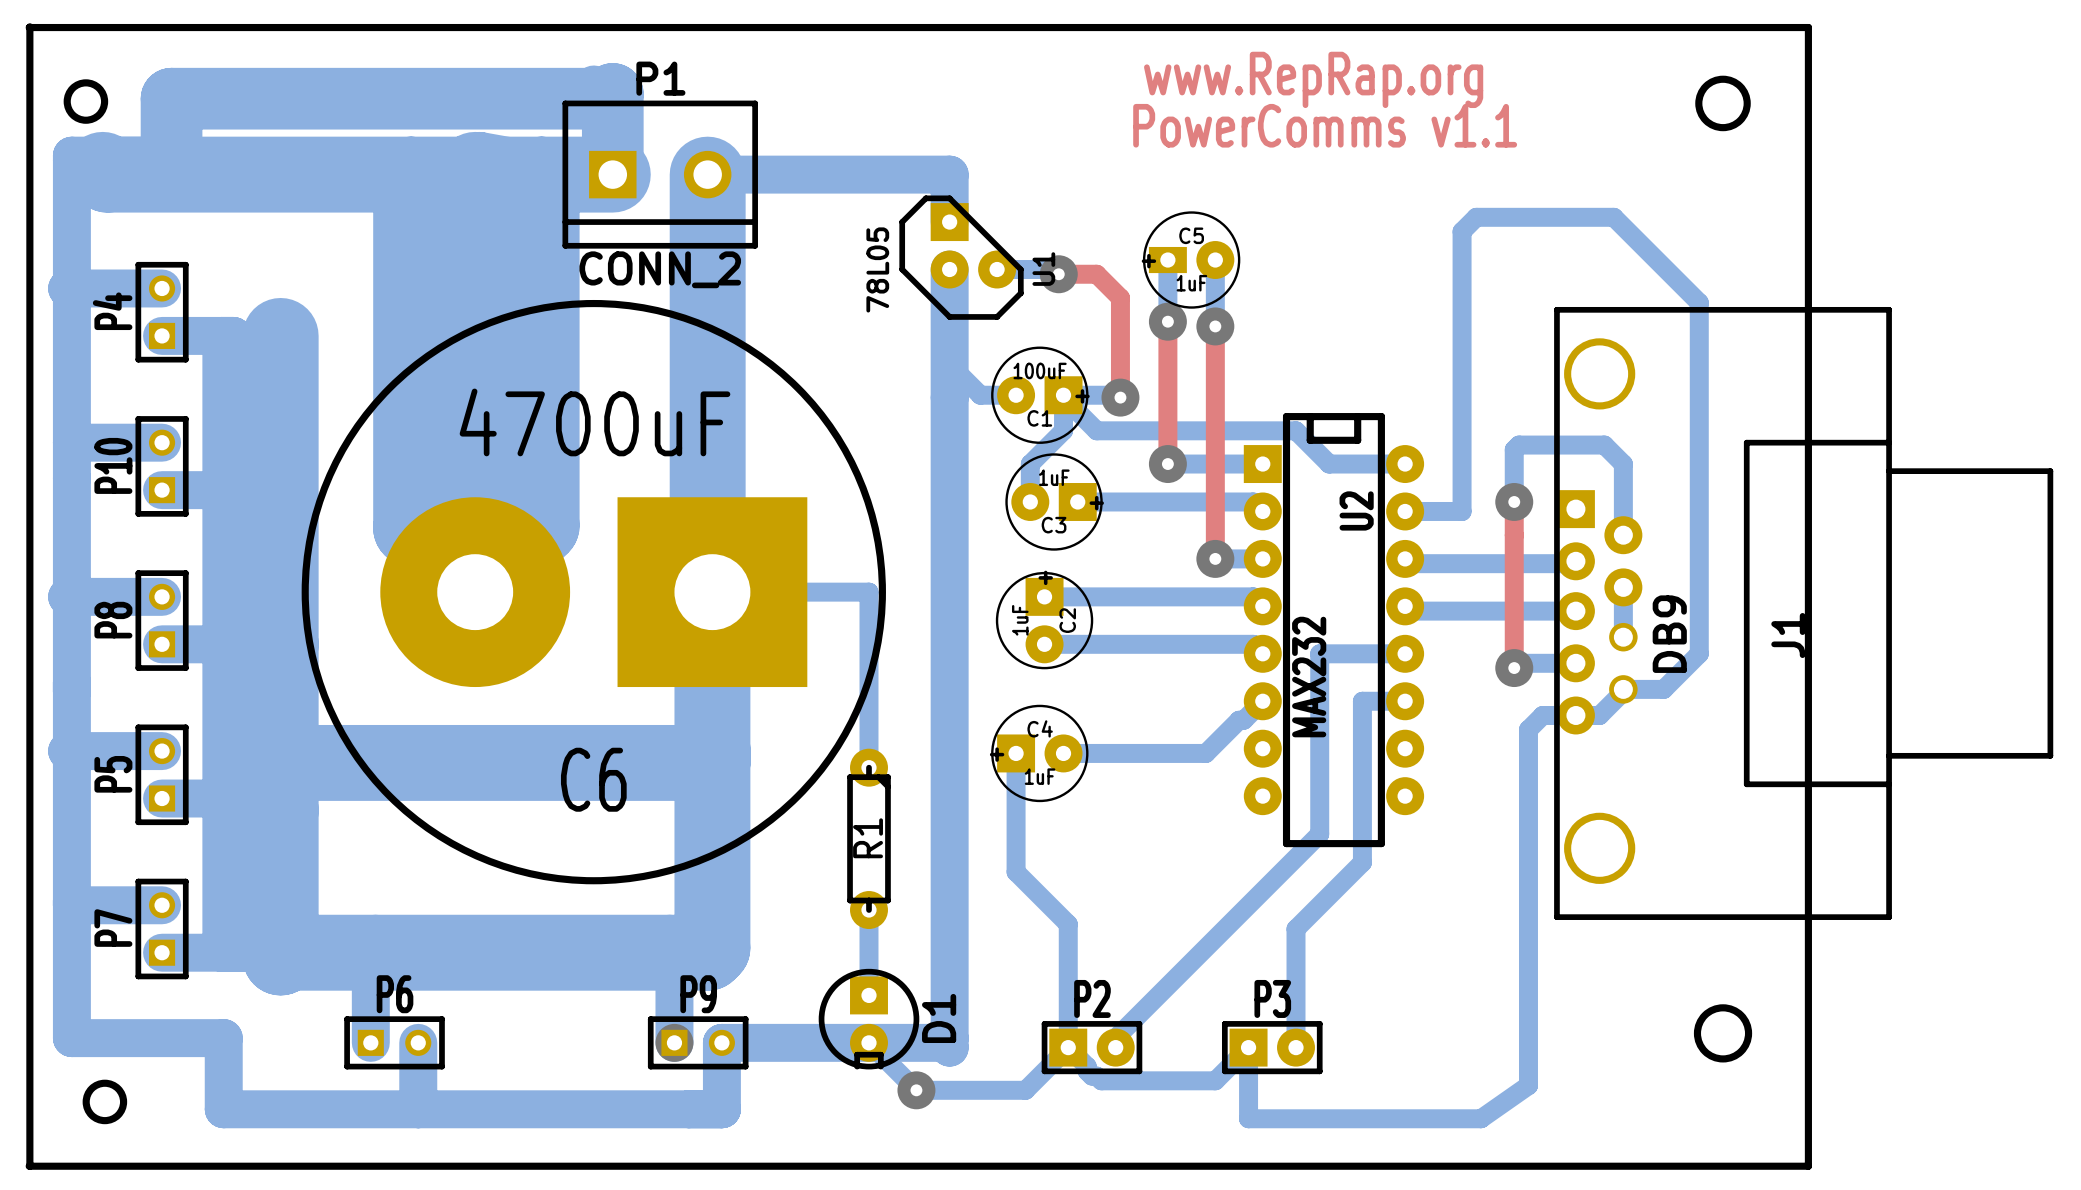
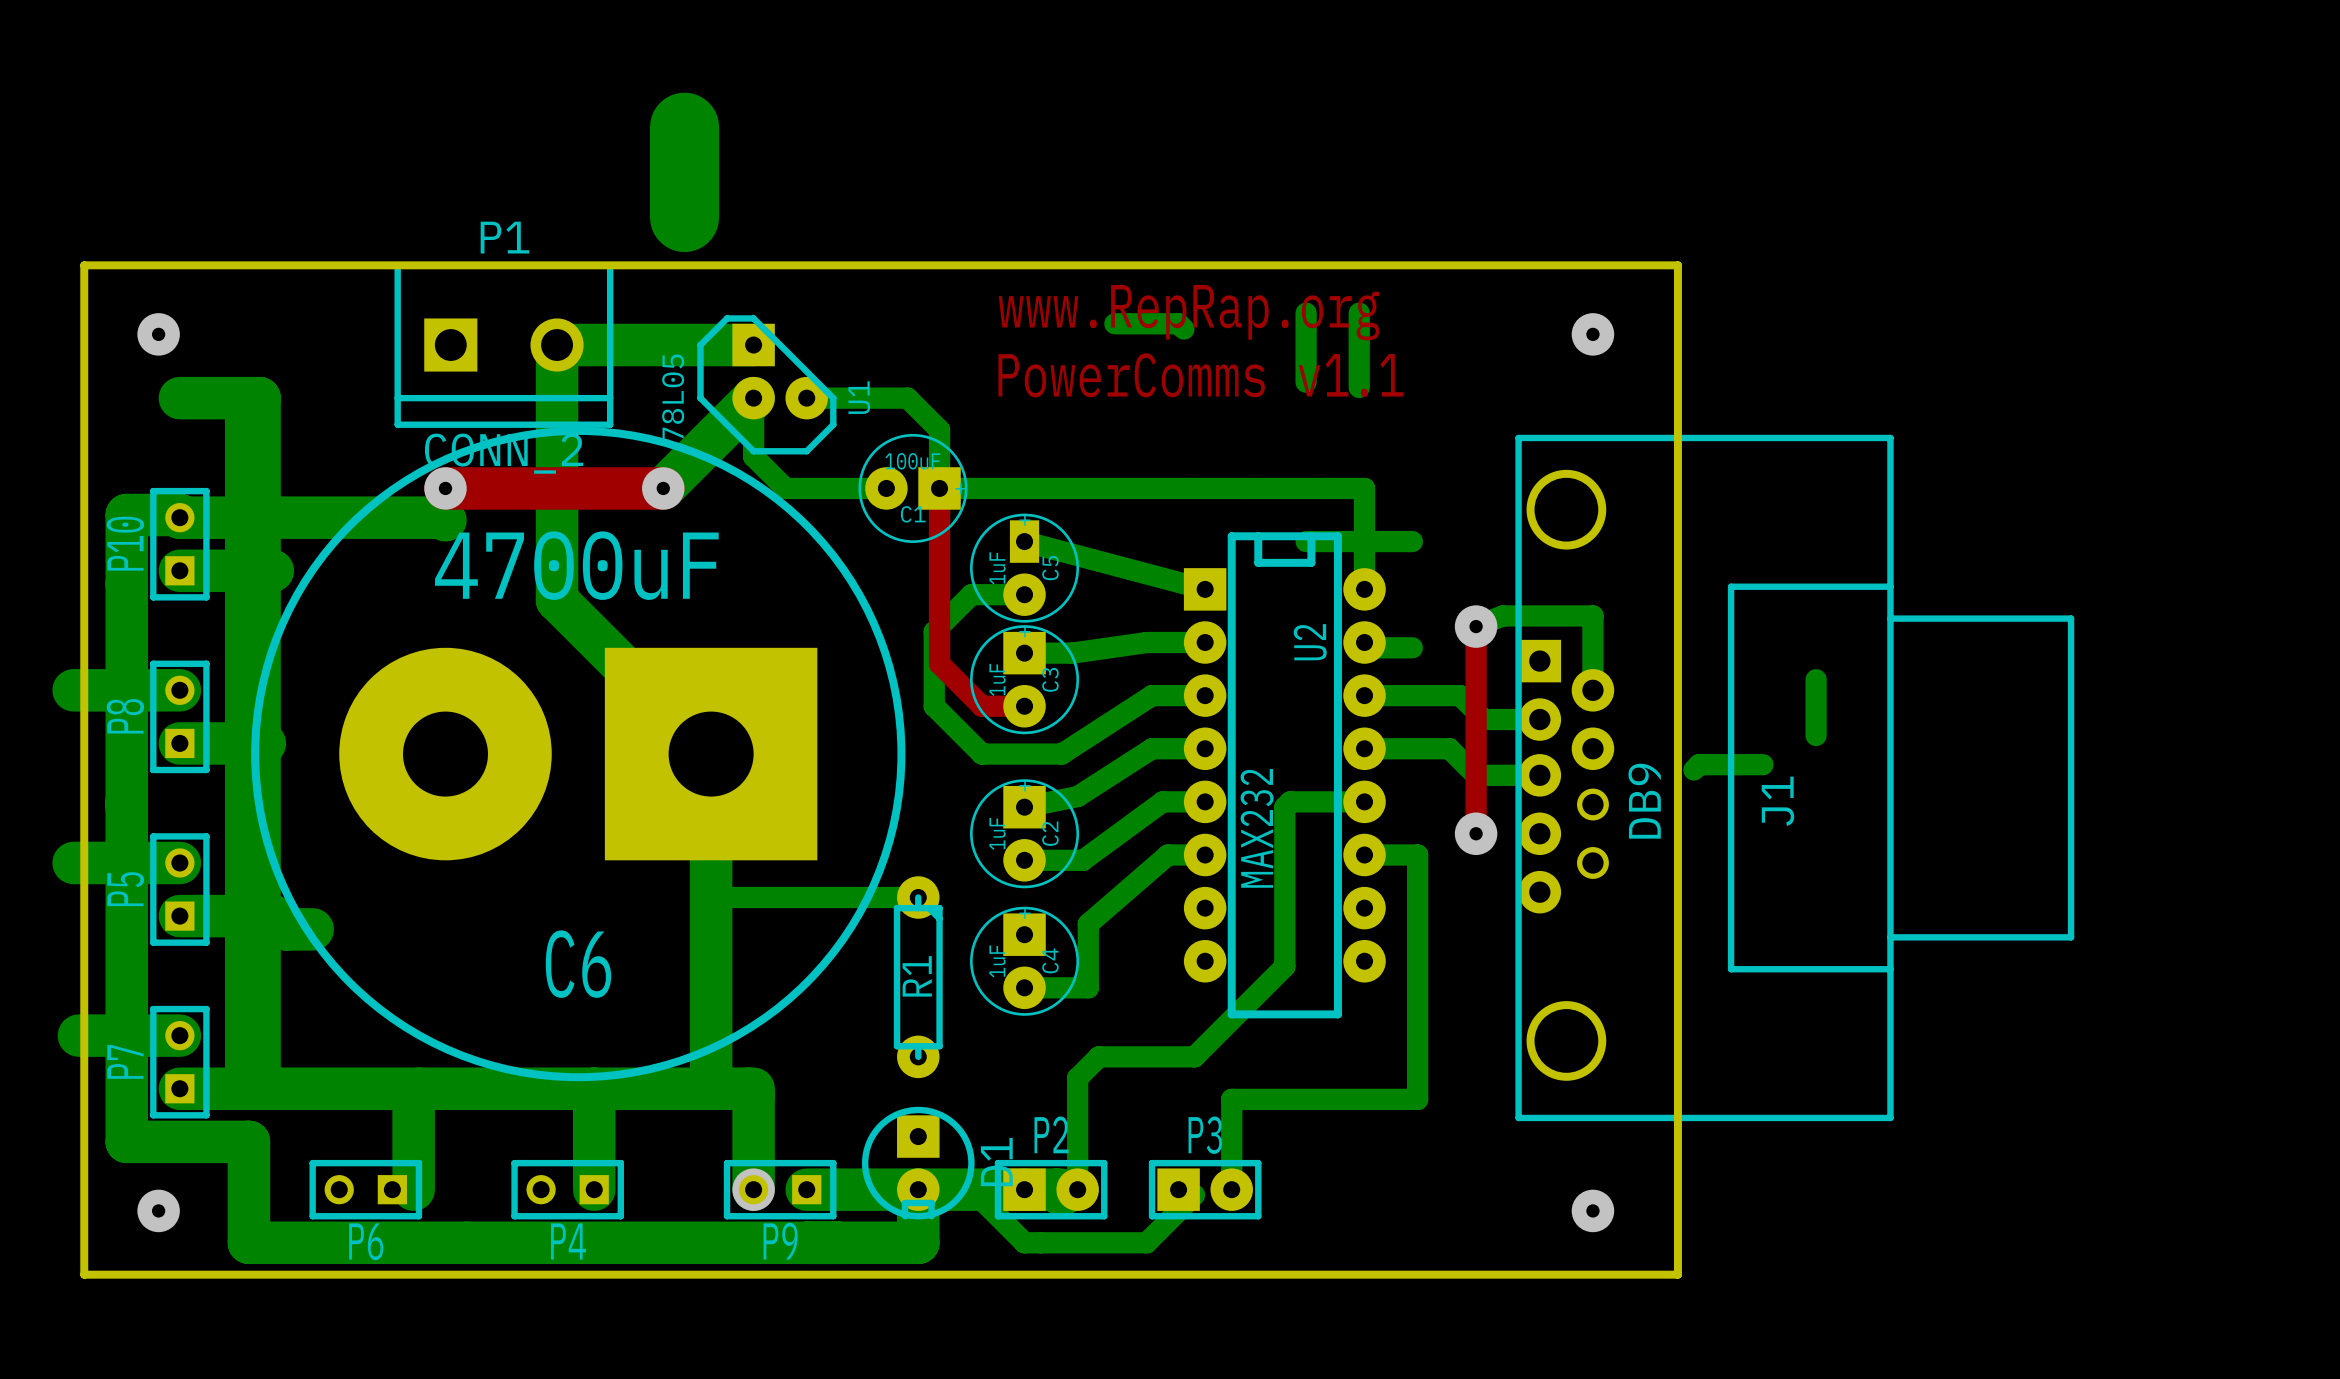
board edge: (29, 26) (29, 1166) -> none
board edge: (29, 27) (1808, 27) (1808, 1166) (29, 1166) -> none
round board edge: [1695, 75, 1751, 132] -> none
round board edge: [63, 79, 109, 124] -> none
text position: www.RepRap.org (1313, 79) -> www.RepRap.org (1189, 312)
bottom track: (593, 84) (612, 93) (608, 98) (171, 98) (171, 155) -> none
text position: PowerComms v1.1 (1325, 125) -> PowerComms v1.1 (1200, 375)
bottom track: (171, 155) (71, 155) (71, 1038) (223, 1038) -> (445, 520) (442, 517) (179, 517) (179, 515) (126, 515) (126, 1141) (248, 1141) (248, 1184)
bottom track: (102, 169) (107, 174) (612, 174) (479, 150) (475, 155) (475, 169) (475, 592) -> none
bottom track: (411, 174) (411, 528) (475, 592) -> none
bottom track: (541, 174) (541, 525) (475, 592) -> none
P1 position: (660, 174) -> (503, 345)
board edge: none -> (84, 265) (1677, 265) (1677, 1274) (84, 1274) (84, 265)
bottom track: (949, 222) (949, 174) (707, 174) (707, 587) (712, 592) -> none
U1 position: (961, 257) -> (766, 384)
C5 rotation: 0° (1191, 260) -> 90° clockwise (1024, 568)
C5 position: (1191, 260) -> (1024, 568)
top track: (1058, 274) (1096, 274) (1120, 297) (1120, 397) -> none
via: (1058, 274) -> none
via: none -> (158, 334)
via: none -> (1592, 334)
bottom track: (67, 288) (162, 288) -> none
bottom track: none -> (753, 345) (557, 345) (557, 600) (711, 754)
P4 rotation: 0° (162, 312) -> 90° counterclockwise (567, 1189)
P4 position: (162, 312) -> (567, 1189)
top track: (1167, 321) (1167, 464) -> none
via: (1167, 321) -> none
top track: (1215, 326) (1215, 558) -> none
via: (1215, 326) -> none
bottom track: (280, 335) (280, 957) -> none
bottom track: none -> (806, 398) (907, 398) (939, 430) (939, 488) (1364, 488) (1364, 589)
bottom track: (1016, 395) (980, 395) (949, 364) (949, 269) (949, 1038) (944, 1042) -> none
C1 position: (1039, 395) -> (912, 488)
bottom track: (1063, 397) (1096, 430) (1296, 430) (1329, 464) (1405, 464) -> none
bottom track: (1120, 397) (1118, 395) (1063, 395) (1063, 430) (1030, 464) (1030, 501) -> none
via: (1120, 397) -> none
top track: none -> (445, 488) (663, 488)
via: none -> (445, 488)
bottom track: none -> (663, 488) (753, 398) (753, 456) (785, 488) (886, 488)
via: none -> (663, 488)
top track: none -> (939, 488) (939, 663) (982, 706) (1024, 706)
bottom track: (71, 442) (162, 442) -> none
bottom track: none -> (1024, 541) (1205, 589)
via: (1167, 464) -> none
C3 rotation: 0° (1054, 501) -> 90° counterclockwise (1024, 679)
C3 position: (1054, 501) -> (1024, 679)
bottom track: (1077, 501) (1253, 501) (1262, 511) -> none
bottom track: (1514, 501) (1514, 449) (1519, 445) (1604, 445) (1623, 464) (1623, 535) -> none
top track: (1514, 501) (1514, 668) -> none
via: (1514, 501) -> none
bottom track: none -> (1024, 594) (971, 594) (934, 631) (934, 706) (982, 754) (1061, 754) (1152, 695) (1205, 695)
bottom track: (1405, 511) (1462, 511) (1462, 231) (1476, 217) (1613, 217) (1699, 302) (1699, 653) (1663, 689) (1623, 689) (1623, 691) (1599, 715) (1542, 715) (1528, 729) (1528, 1085) (1481, 1118) (1248, 1118) (1248, 1047) (1215, 1080) (1101, 1080) (1096, 1076) (1091, 1076) (1087, 1071) (1087, 1066) (1068, 1047) (1068, 924) (1016, 872) (1016, 753) -> none
bottom track: none -> (1476, 626) (1502, 615) (1592, 615) (1592, 690)
top track: none -> (1476, 626) (1476, 833)
via: none -> (1476, 626)
bottom track: none -> (1205, 642) (1146, 642) (1072, 653) (1024, 653)
via: (1215, 558) -> none
bottom track: (1405, 558) (1409, 563) (1575, 563) (1575, 561) -> none
C6 position: (593, 592) -> (578, 754)
bottom track: (712, 592) (868, 592) (868, 767) -> none
bottom track: (712, 592) (712, 947) (707, 952) (674, 952) -> none
bottom track: (1044, 596) (1253, 596) (1262, 606) -> none
bottom track: none -> (1364, 695) (1460, 695) (1484, 719) (1539, 719)
bottom track: (1405, 606) (1409, 611) (1575, 611) -> none
J1 position: (1803, 613) -> (1794, 777)
C2 position: (1044, 620) -> (1024, 833)
U2 position: (1333, 630) -> (1284, 775)
bottom track: (1044, 644) (1253, 644) (1262, 653) -> none
bottom track: none -> (1205, 748) (1152, 748) (1077, 796) (1024, 807)
bottom track: none -> (1364, 748) (1449, 748) (1476, 775) (1539, 775)
bottom track: none -> (711, 754) (711, 897) (918, 897)
bottom track: none -> (711, 754) (711, 1088)
bottom track: (1405, 653) (1319, 653) (1319, 834) (1115, 1038) (1115, 1047) -> none
via: (1514, 668) -> none
bottom track: none -> (1205, 801) (1162, 801) (1082, 860) (1024, 860)
bottom track: none -> (1364, 801) (1290, 801) (1284, 807) (1284, 966) (1194, 1056) (1098, 1056) (1077, 1078) (1077, 1189)
bottom track: (1262, 701) (1243, 720) (1239, 720) (1205, 753) (1063, 753) -> none
bottom track: (1405, 701) (1362, 701) (1362, 862) (1296, 928) (1296, 1047) -> none
via: none -> (1476, 833)
bottom track: none -> (1205, 855) (1167, 855) (1088, 924) (1088, 987) (1024, 987)
bottom track: none -> (1364, 855) (1417, 855) (1417, 1099) (1231, 1099) (1231, 1189)
C4 rotation: 0° (1039, 753) -> 90° clockwise (1024, 961)
C4 position: (1039, 753) -> (1024, 961)
bottom track: (280, 762) (712, 762) -> none
R1 position: (868, 838) -> (918, 977)
bottom track: (868, 910) (868, 995) -> none
bottom track width: thick (280, 952) (674, 952) -> thin (312, 1088) (753, 1088)
bottom track: none -> (594, 1088) (594, 1189)
round board edge: [1693, 1004, 1753, 1063] -> none
D1 position: (868, 1019) -> (918, 1163)
P6 rotation: 0° (394, 1042) -> 180° (365, 1189)
P6 position: (394, 1042) -> (365, 1189)
bottom track: (418, 1042) (418, 1109) -> none
P9 rotation: 0° (698, 1042) -> 180° (780, 1189)
bottom track: (721, 1042) (721, 1109) (223, 1109) (223, 1090) -> (918, 1189) (918, 1242) (248, 1242)
P2 position: (1091, 1047) -> (1051, 1189)
P3 position: (1272, 1047) -> (1205, 1189)
via: none -> (158, 1210)
via: none -> (1592, 1210)
round board edge: [82, 1079, 128, 1125] -> none
via: (916, 1090) -> none

